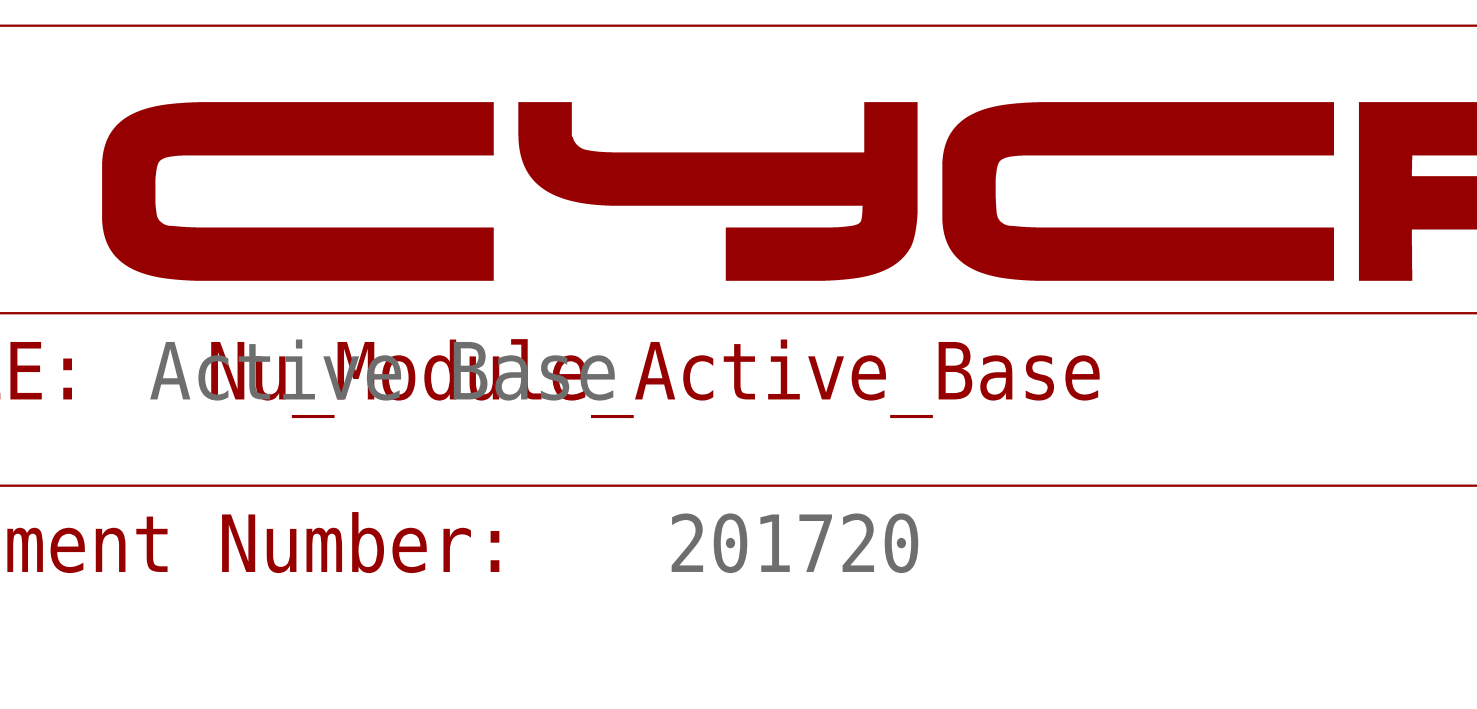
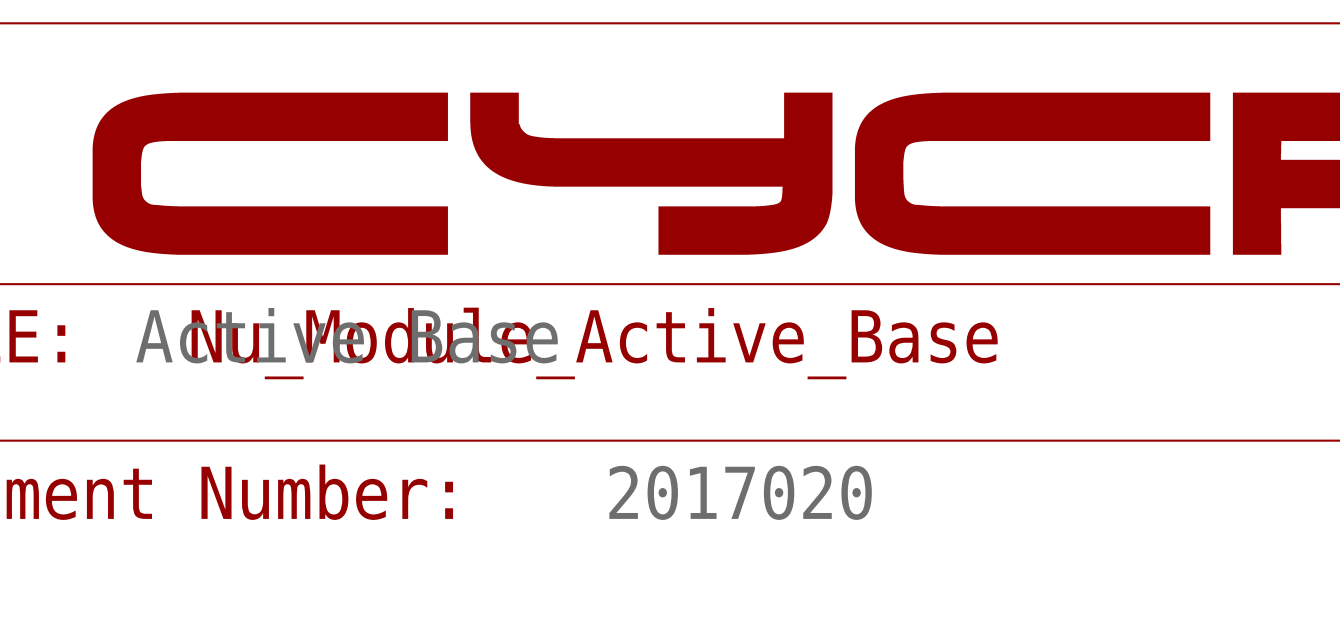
text: 201720 (794, 543) -> 2017020 (740, 492)

